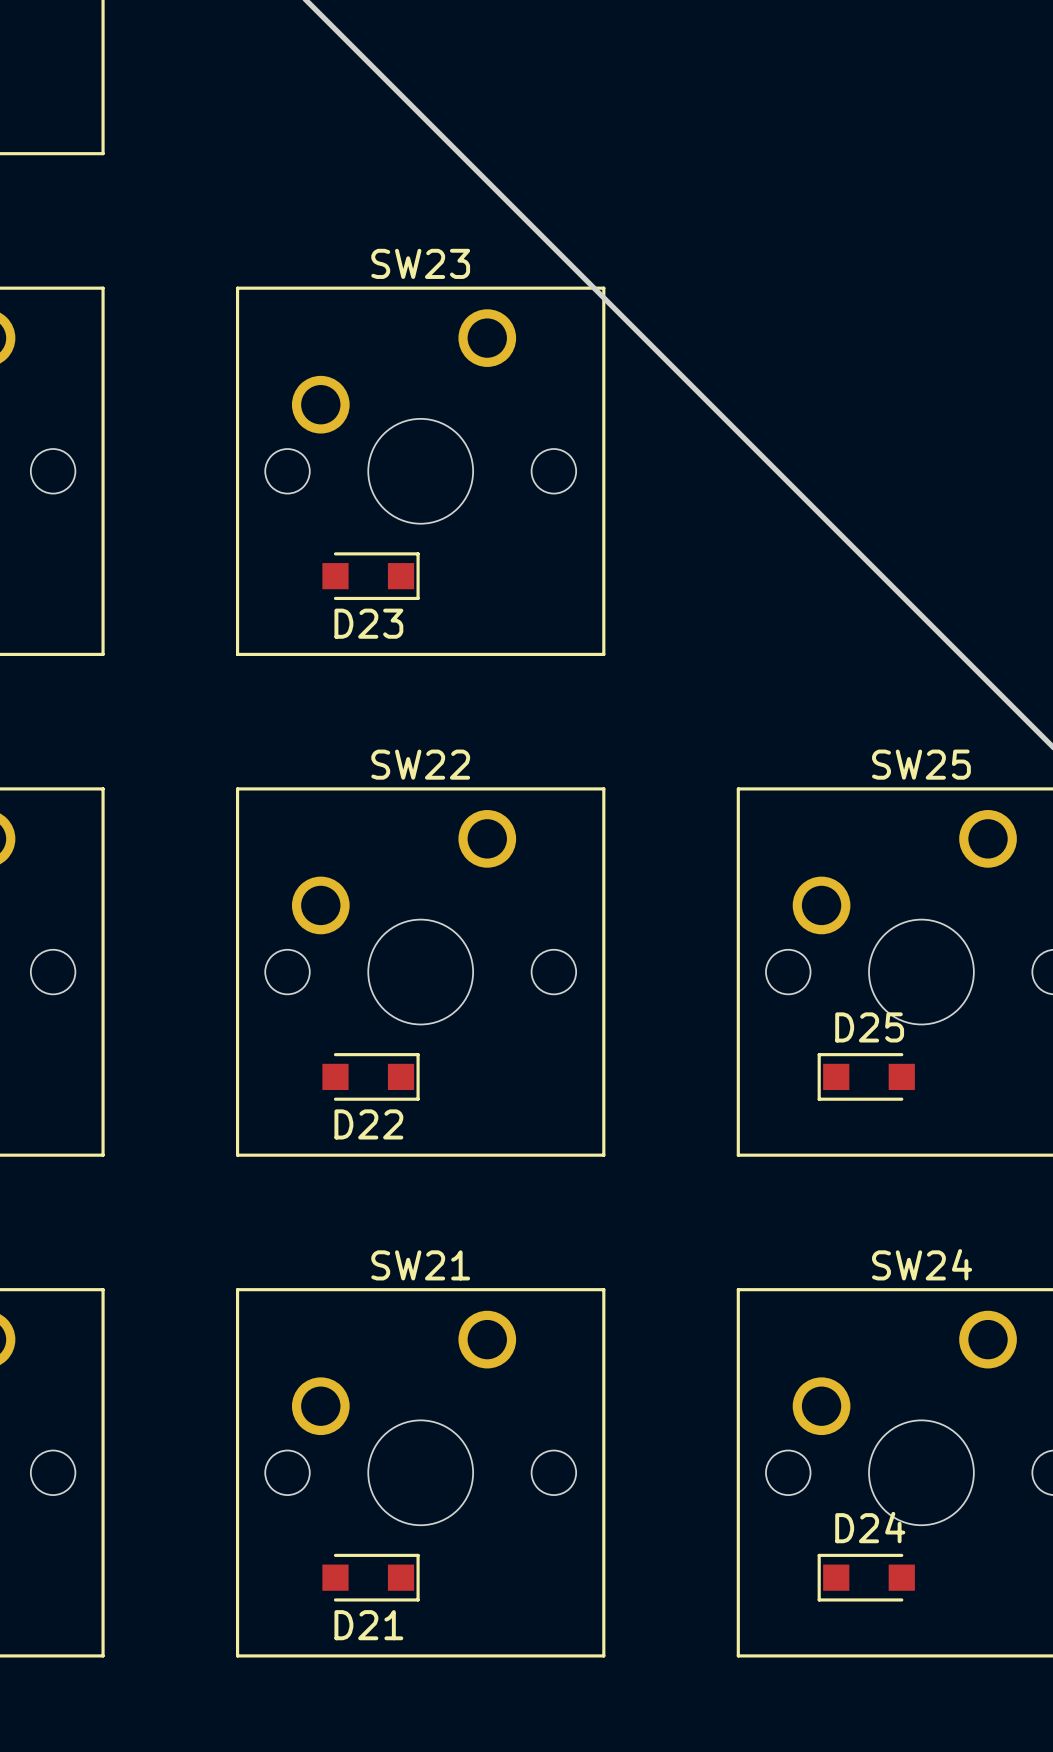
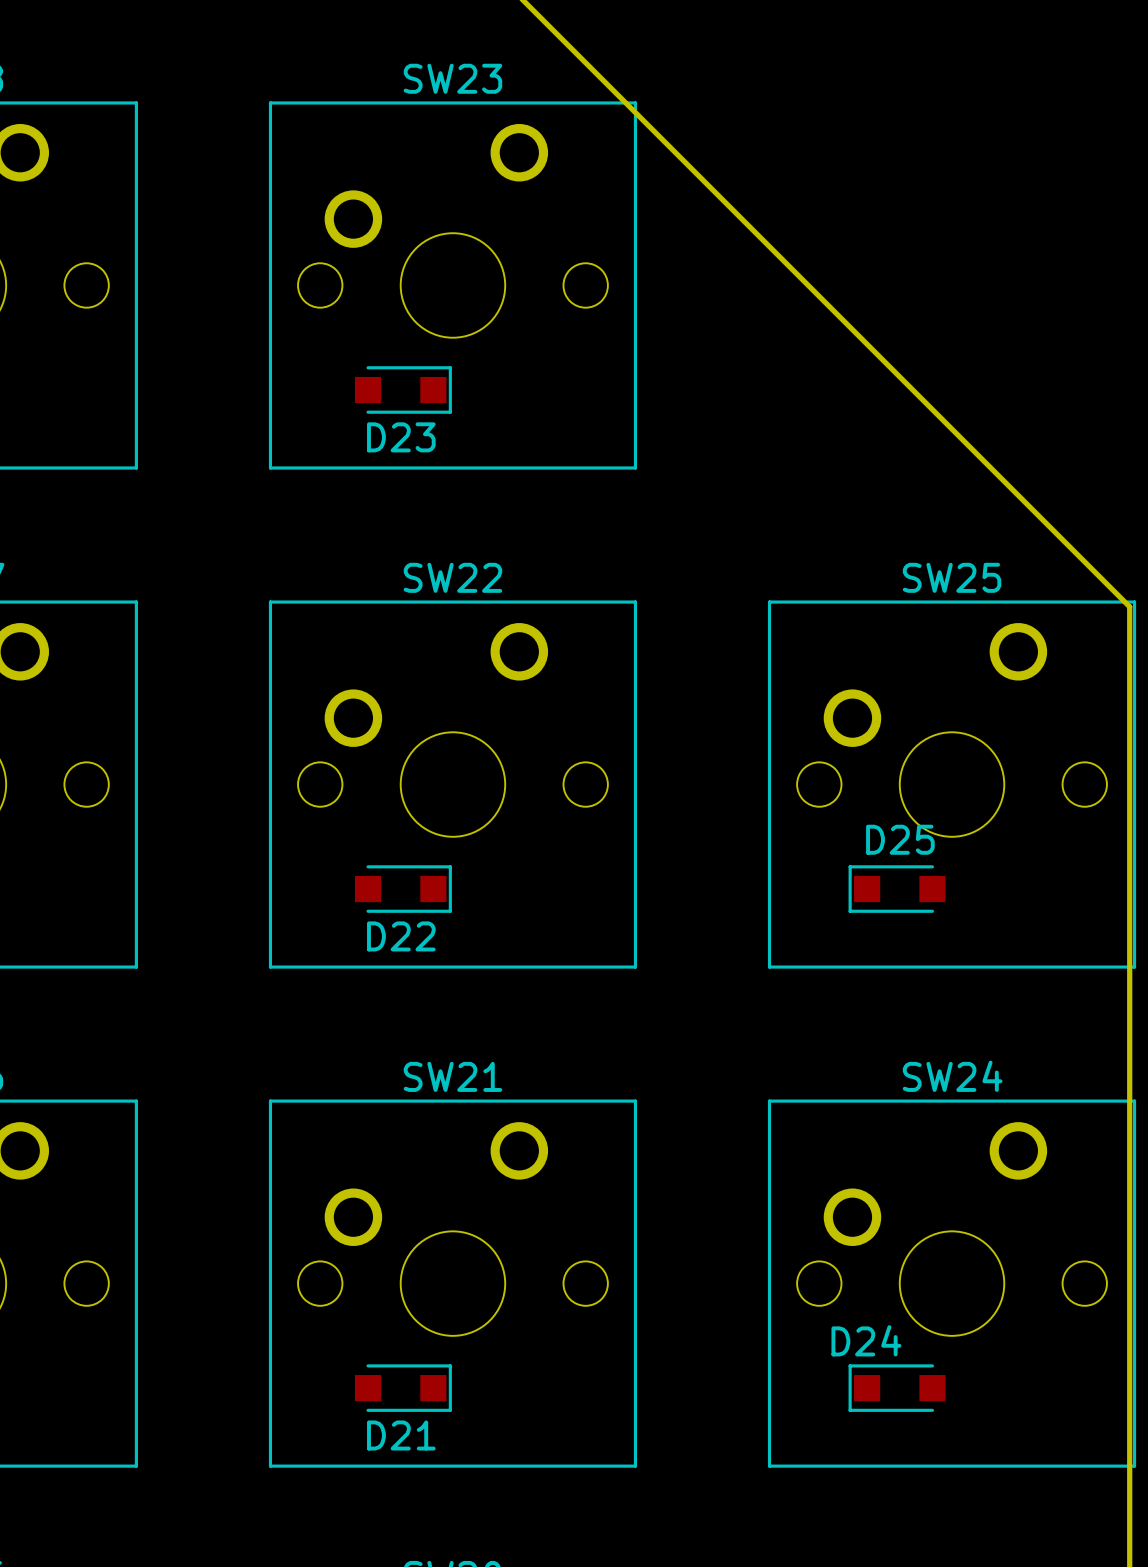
D24 name position: D24 (870, 1527) -> D24 (866, 1340)

